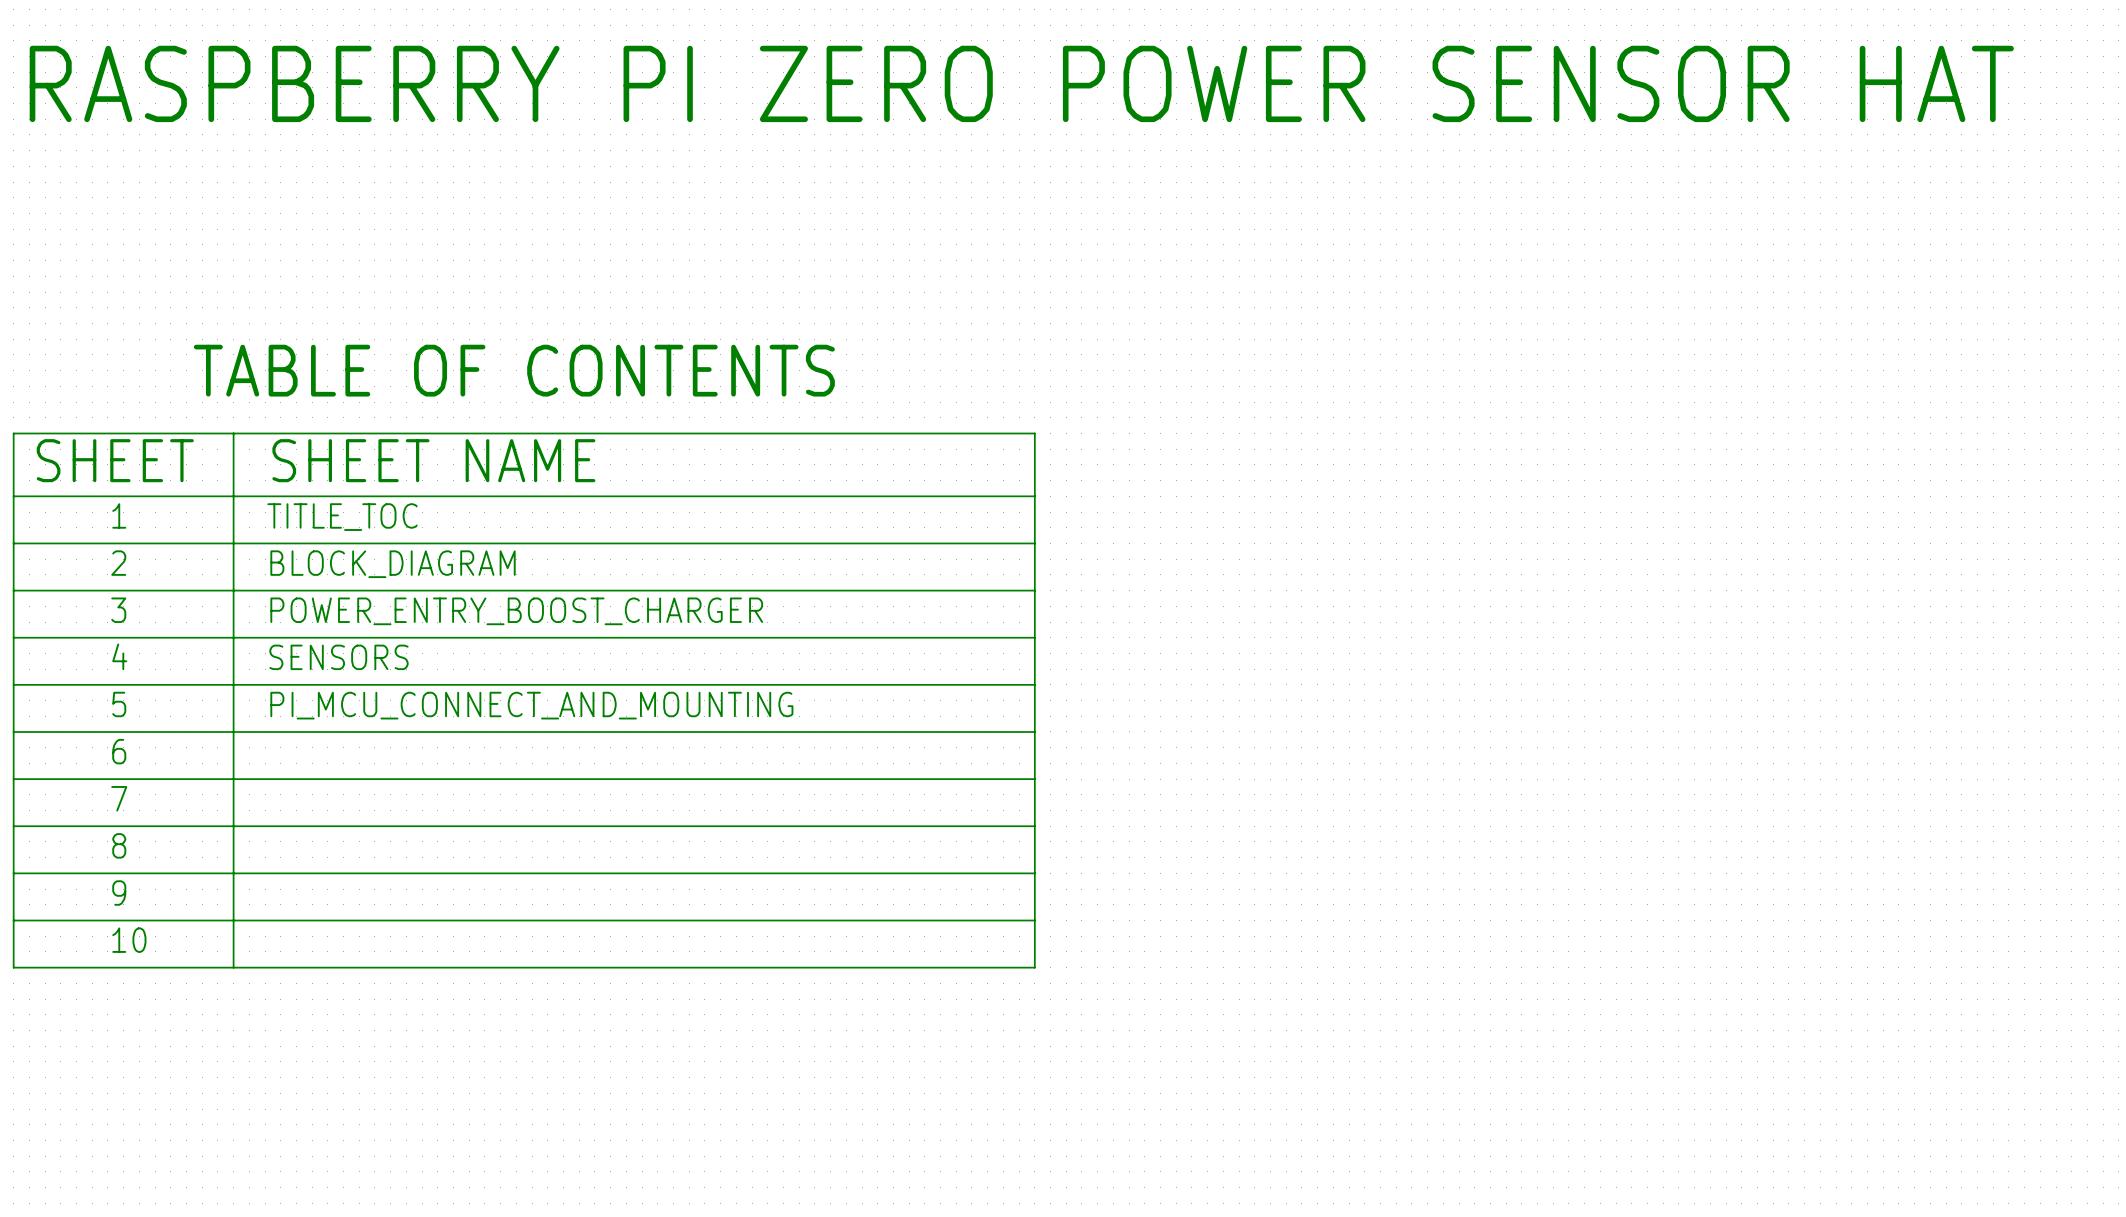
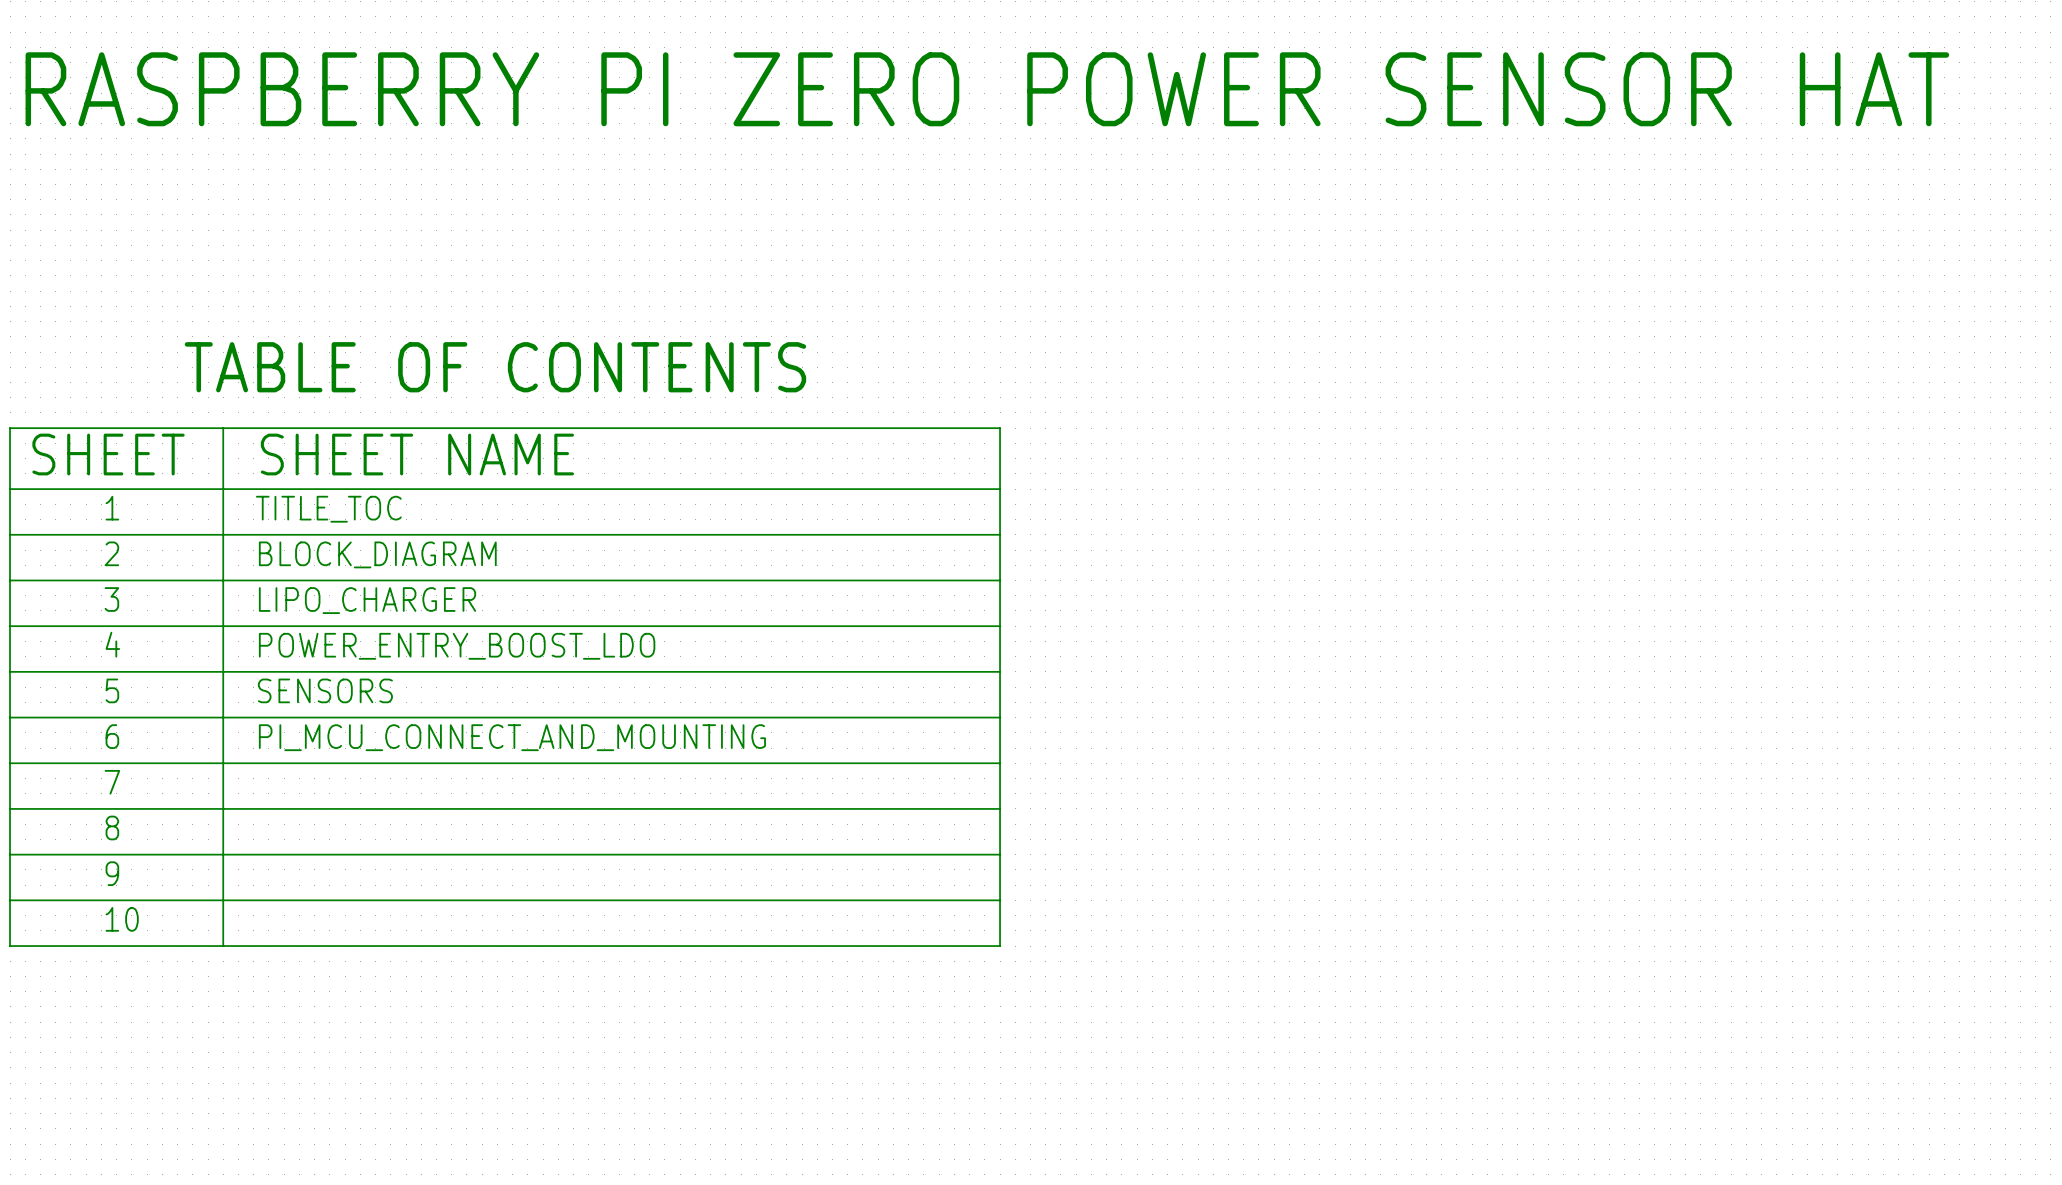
text: POWER_ENTRY_BOOST_CHARGER (516, 611) -> LIPO_CHARGER (367, 600)
text: SENSORS (338, 657) -> POWER_ENTRY_BOOST_LDO (457, 646)
text: PI_MCU_CONNECT_AND_MOUNTING (531, 705) -> SENSORS (325, 690)
text: none -> PI_MCU_CONNECT_AND_MOUNTING (512, 737)

